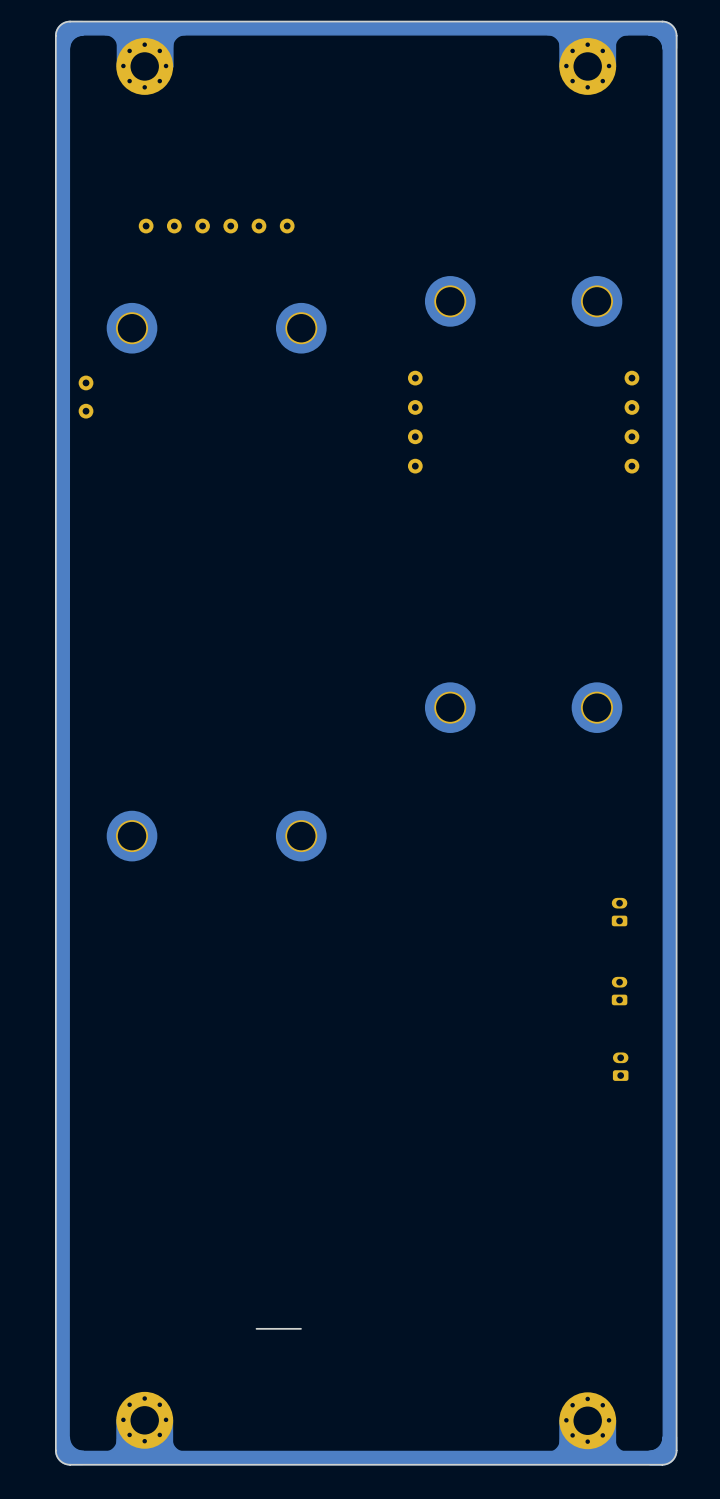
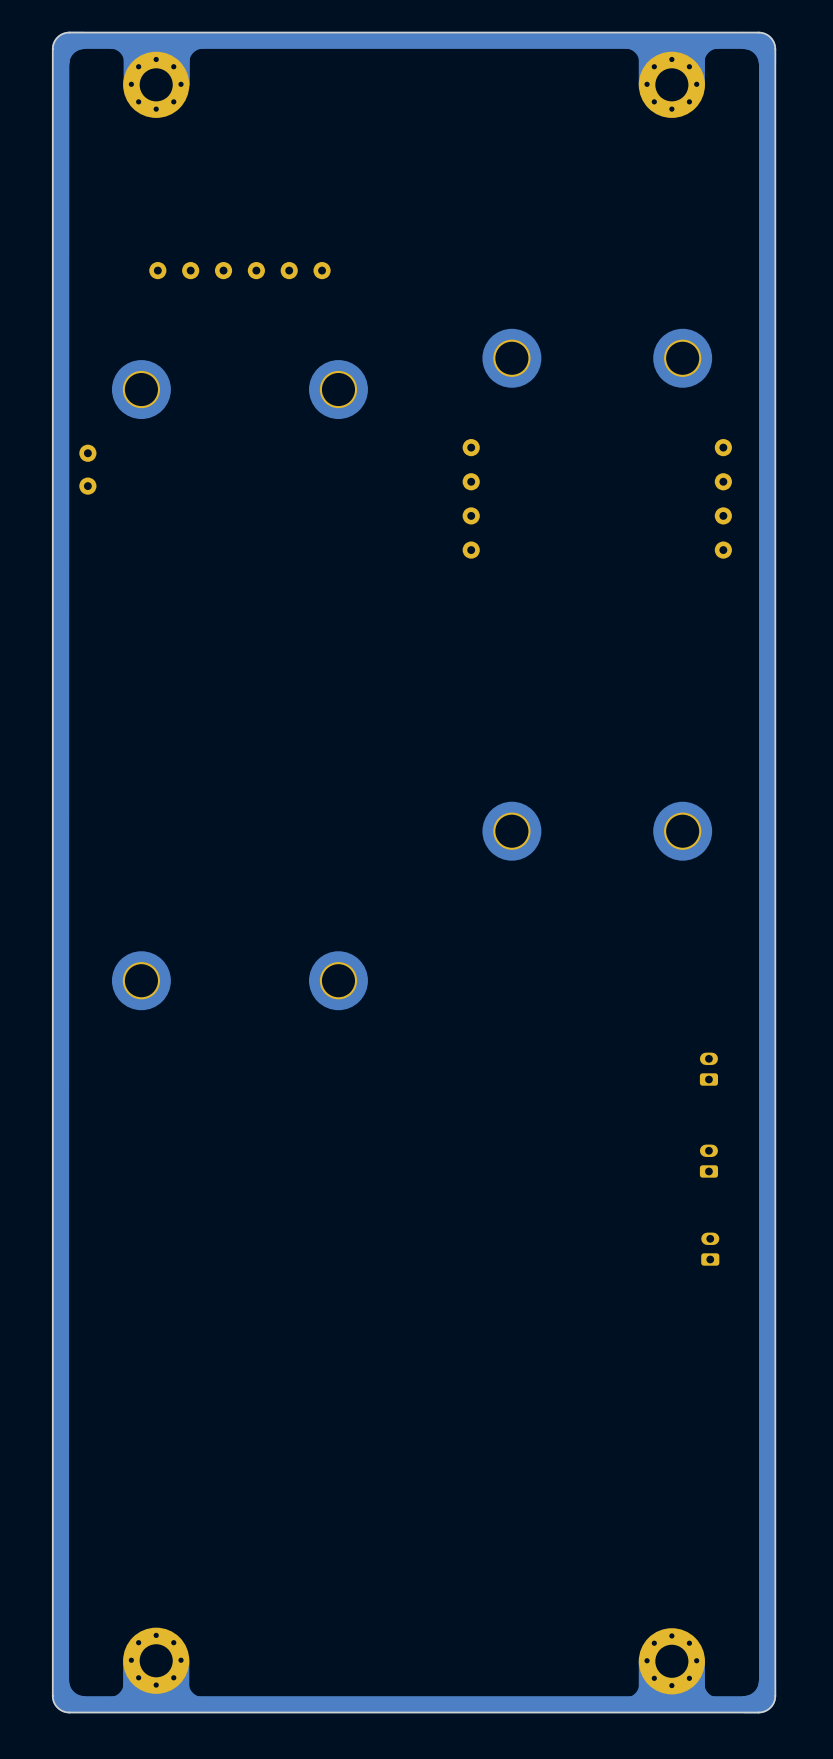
board edge: (300, 1328) (256, 1328) -> none

